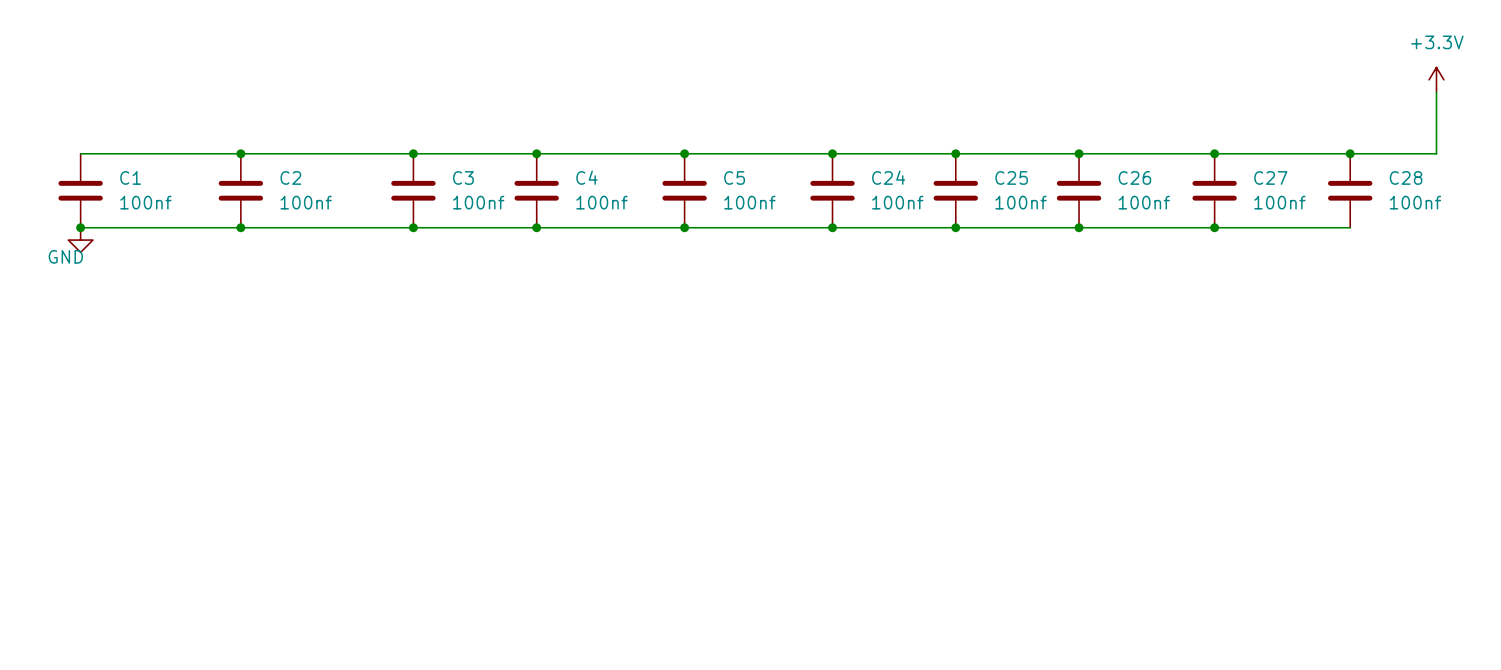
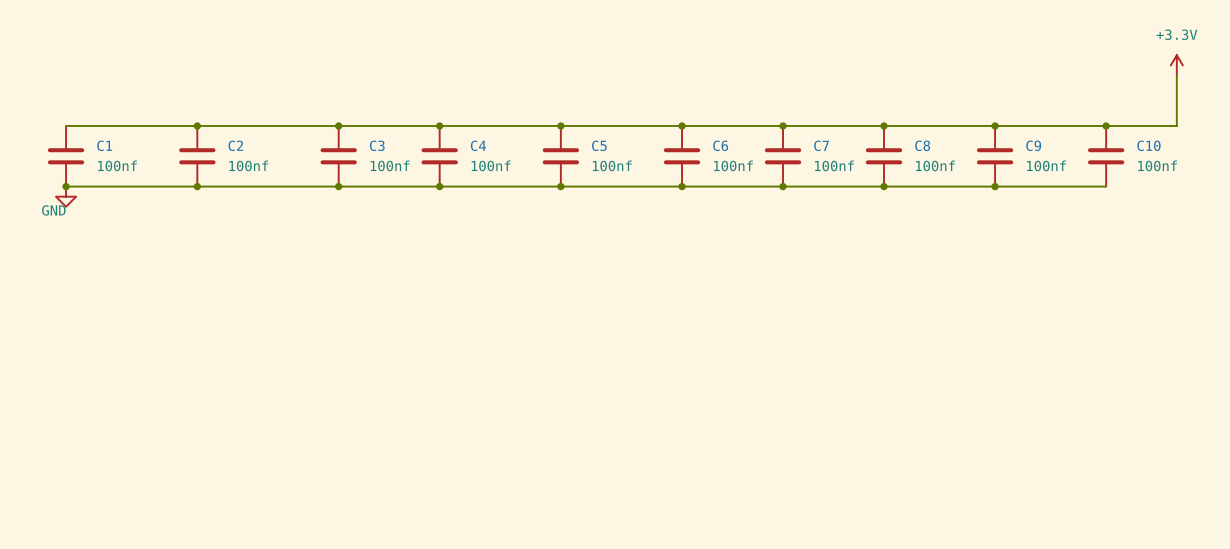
C24 name: C24 (888, 177) -> C6 (720, 145)
C25 name: C25 (1011, 177) -> C7 (821, 145)
C26 name: C26 (1134, 177) -> C8 (922, 145)
C27 name: C27 (1270, 177) -> C9 (1033, 145)
C28 name: C28 (1406, 177) -> C10 (1148, 145)

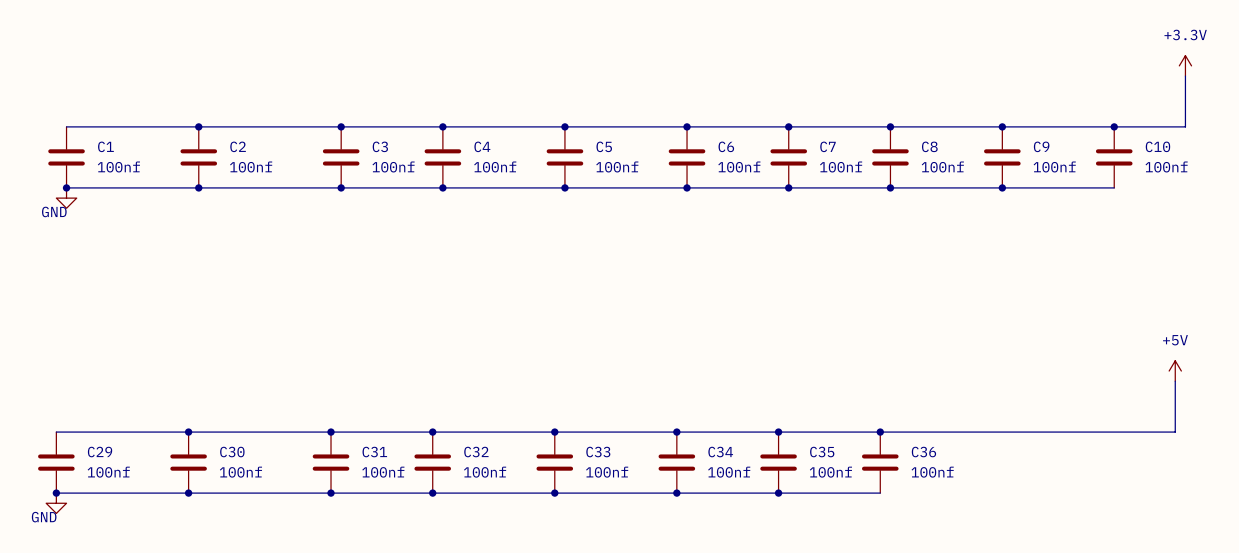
power symbol: none -> +5V (1175, 371)
wire: none -> (1175, 381) (1175, 432) (56, 432)
junction: none -> (188, 432)
junction: none -> (331, 432)
junction: none -> (432, 432)
junction: none -> (554, 432)
junction: none -> (676, 432)
junction: none -> (778, 432)
junction: none -> (880, 432)
C29: none -> 100nf (56, 462)
C30: none -> 100nf (188, 462)
C31: none -> 100nf (331, 462)
C32: none -> 100nf (432, 462)
C33: none -> 100nf (554, 462)
C34: none -> 100nf (676, 462)
C35: none -> 100nf (778, 462)
C36: none -> 100nf (880, 462)
wire: none -> (56, 493) (880, 493)
junction: none -> (56, 493)
junction: none -> (188, 493)
junction: none -> (331, 493)
junction: none -> (432, 493)
junction: none -> (554, 493)
junction: none -> (676, 493)
junction: none -> (778, 493)
power symbol: none -> GND (56, 503)

